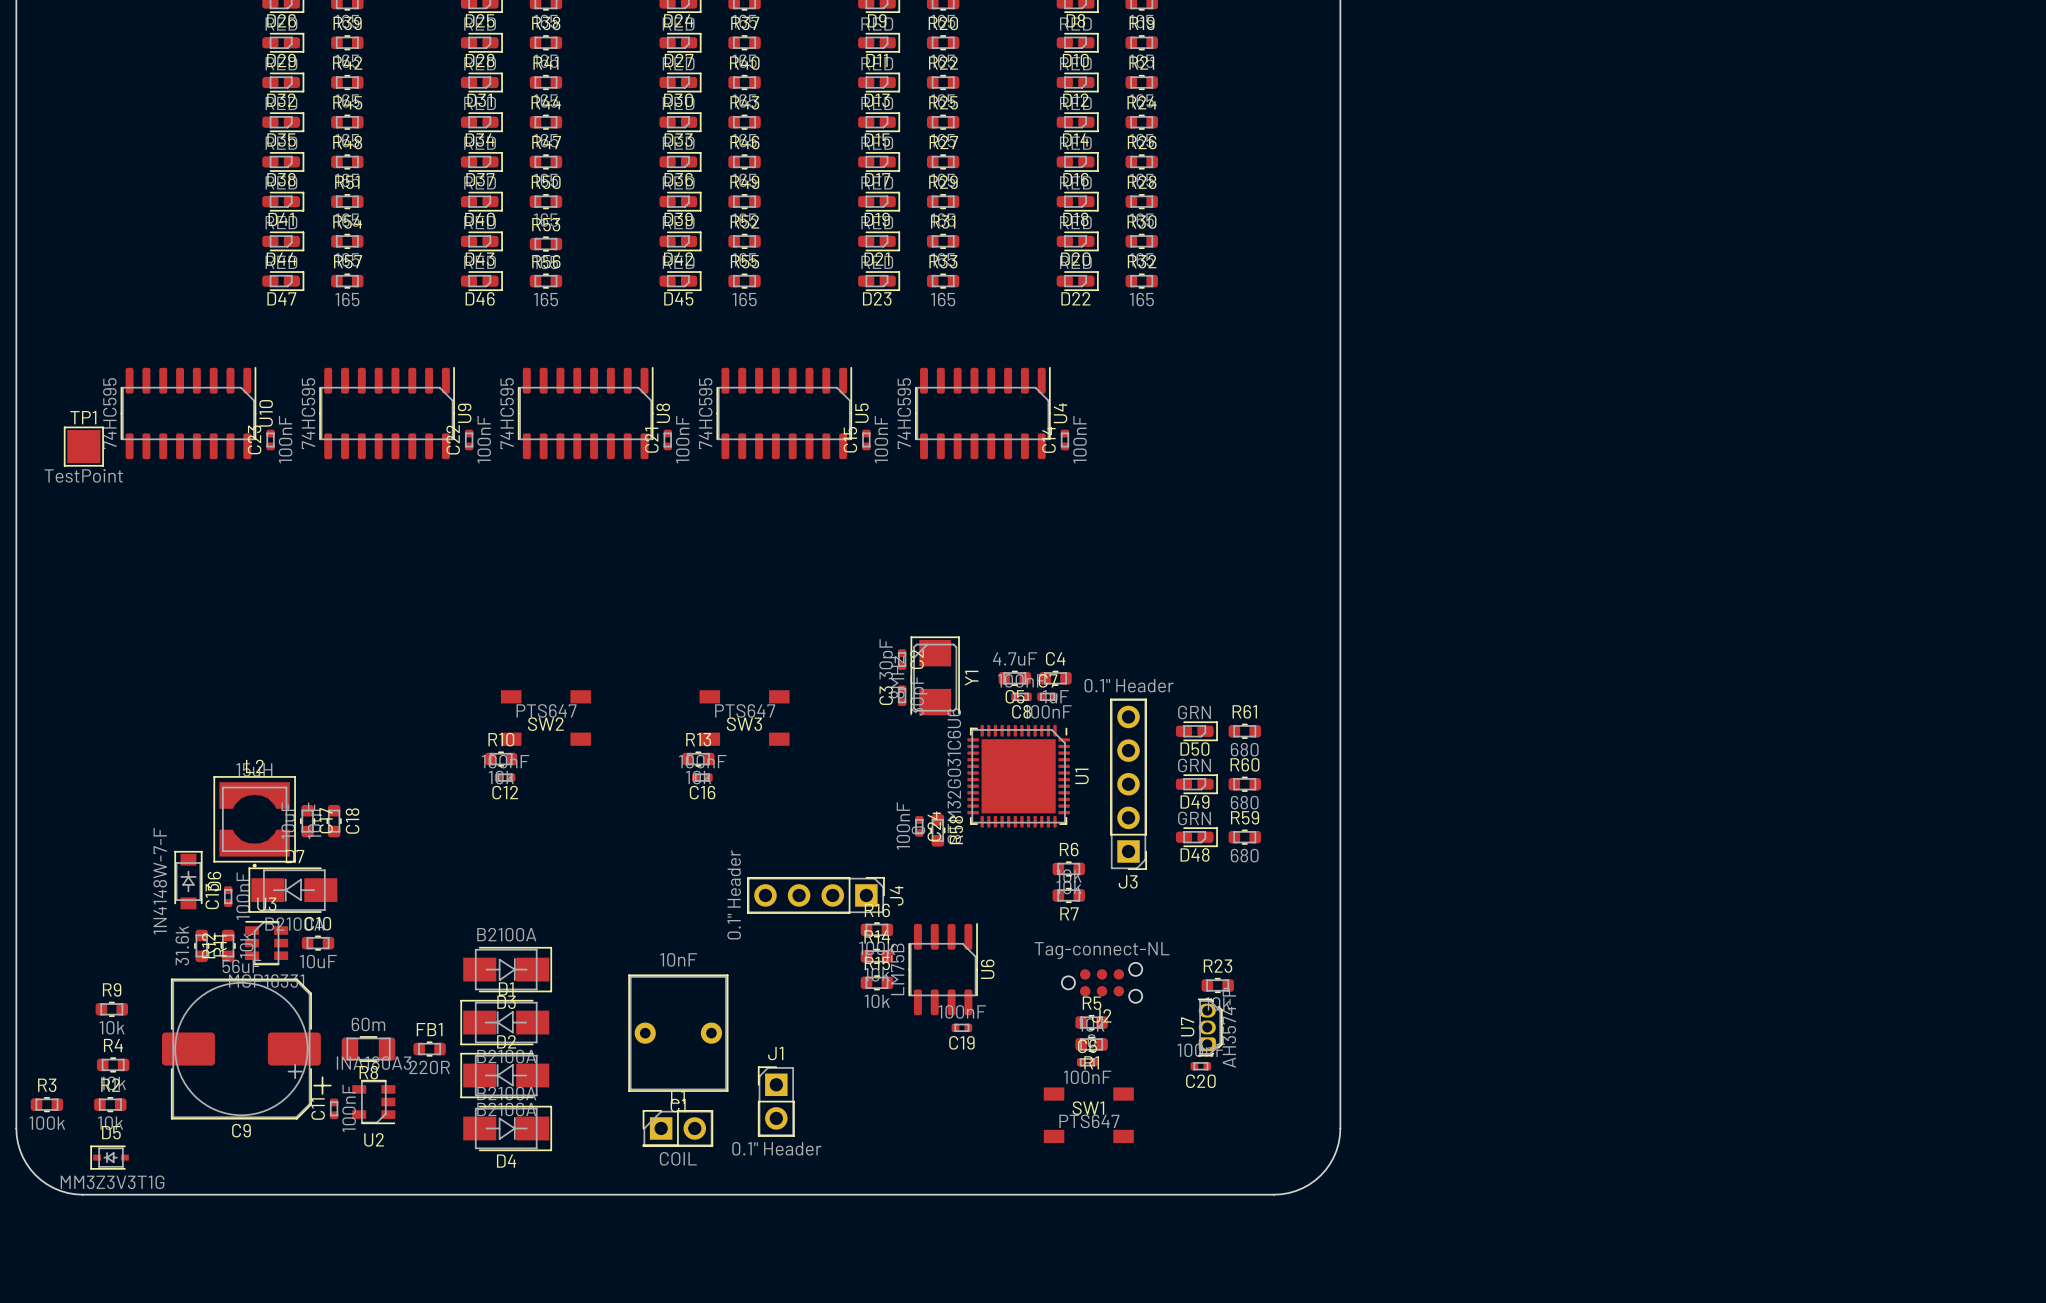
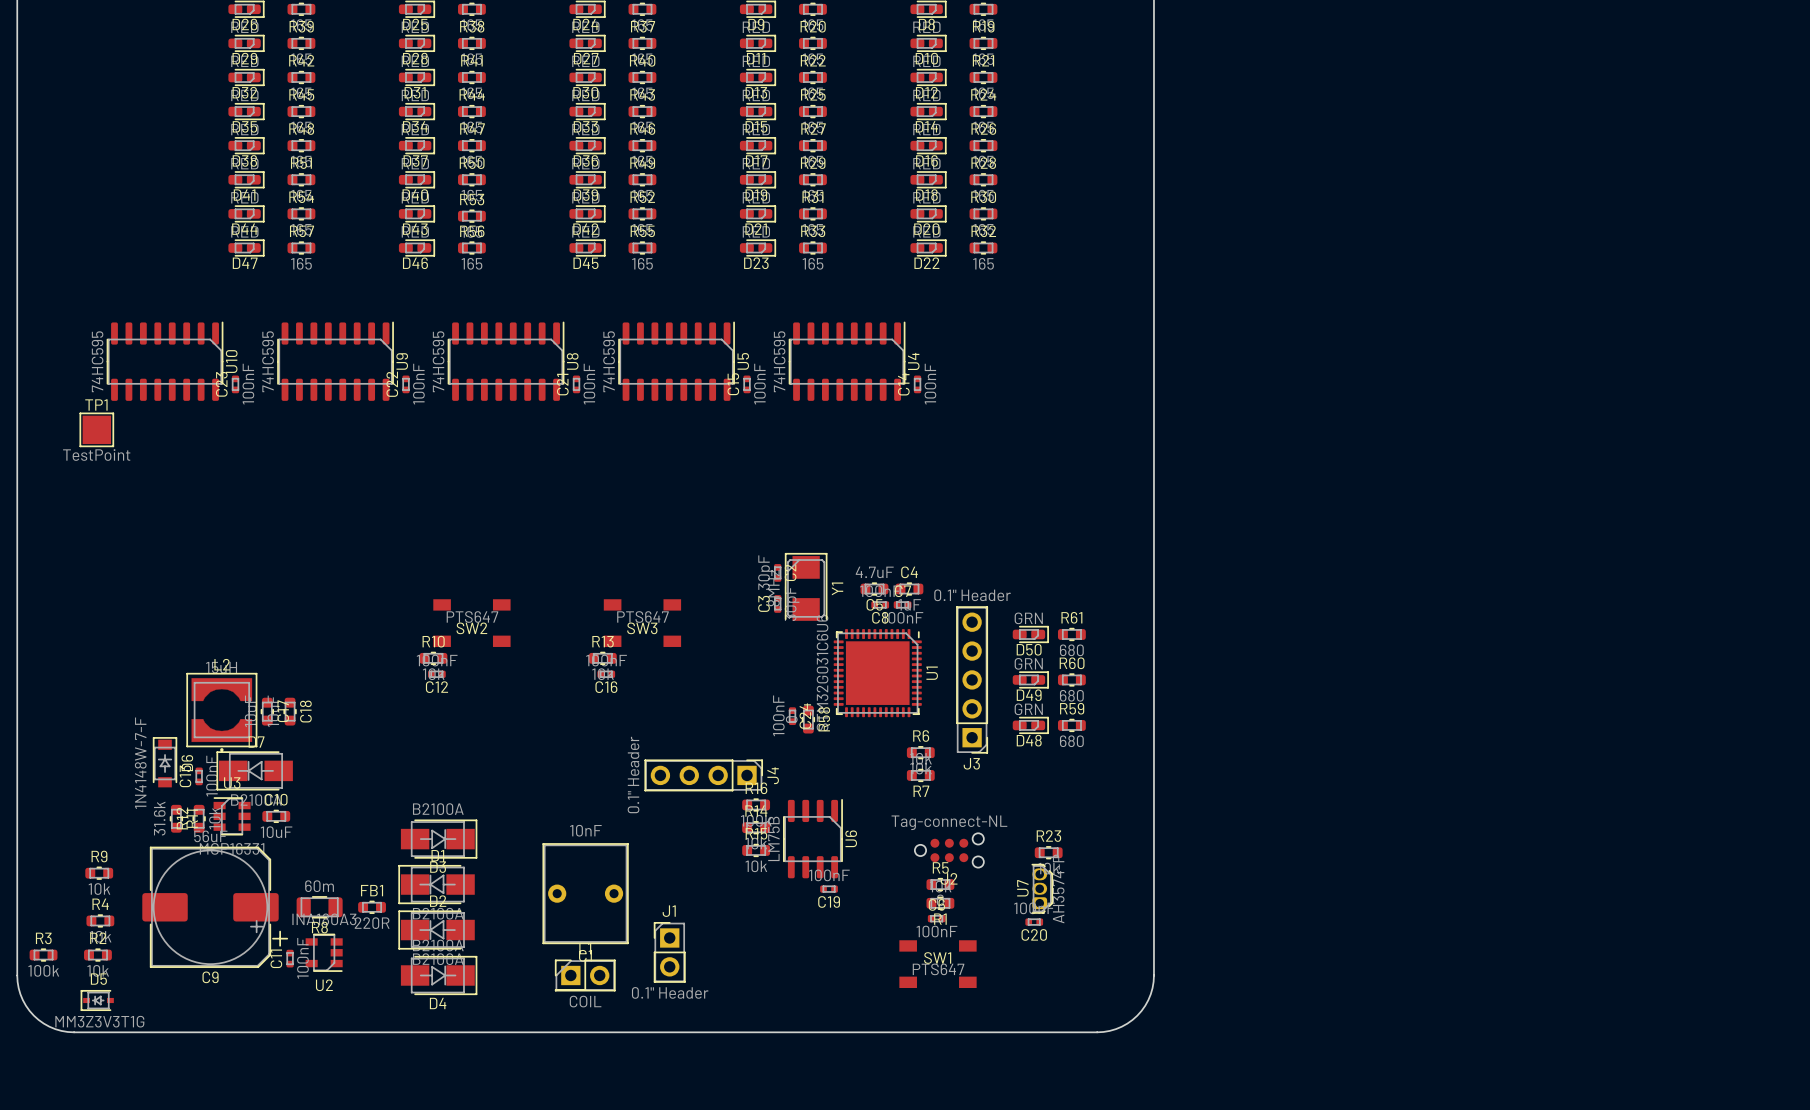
TP1 position: (83, 446) -> (96, 429)

